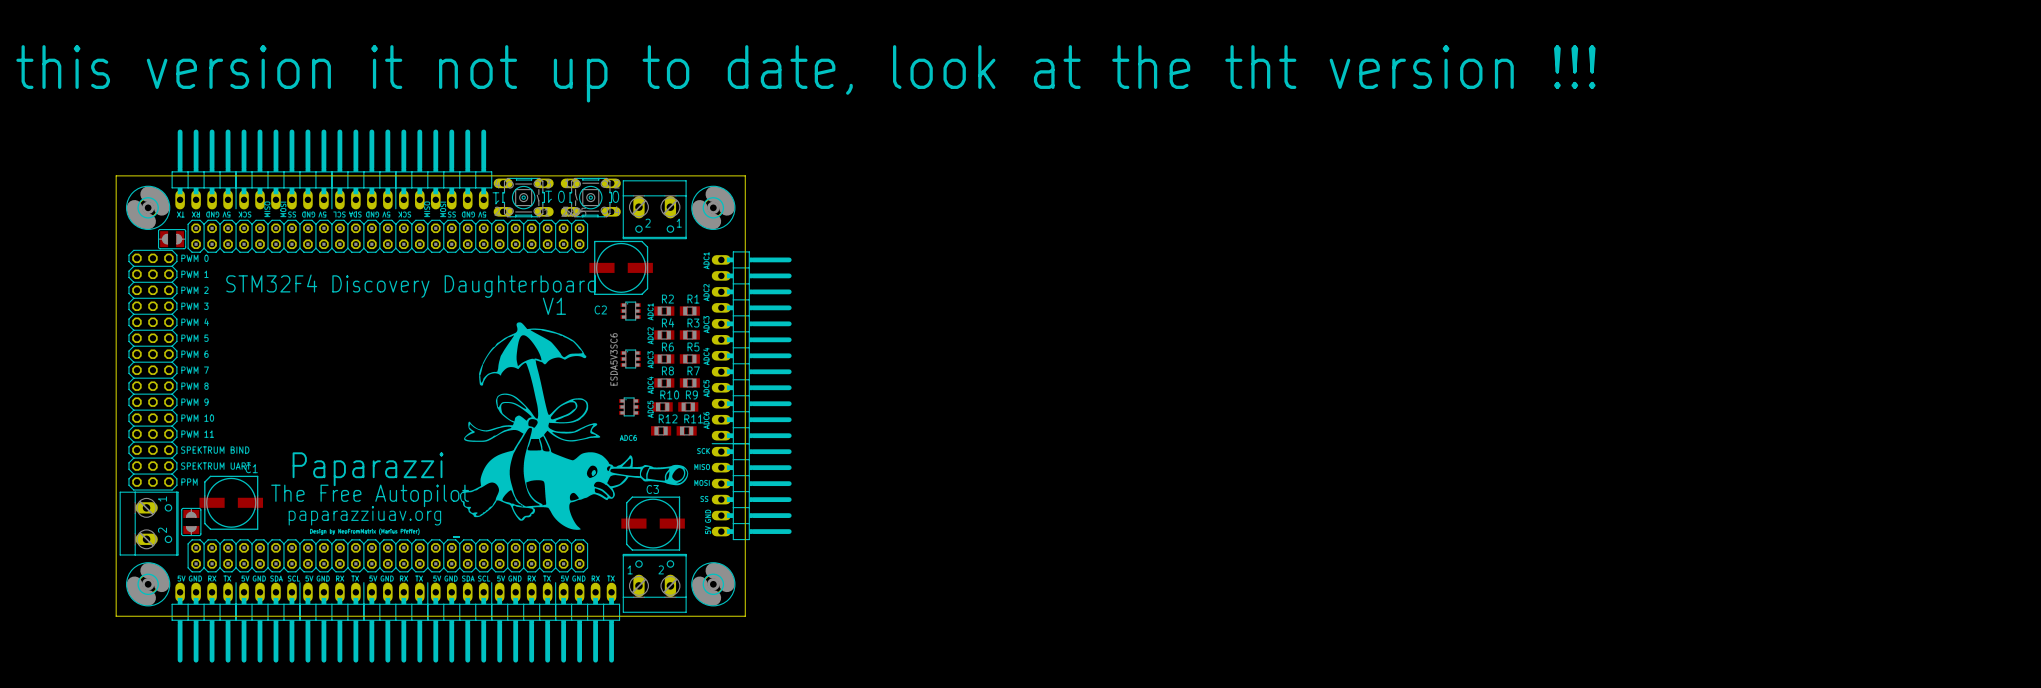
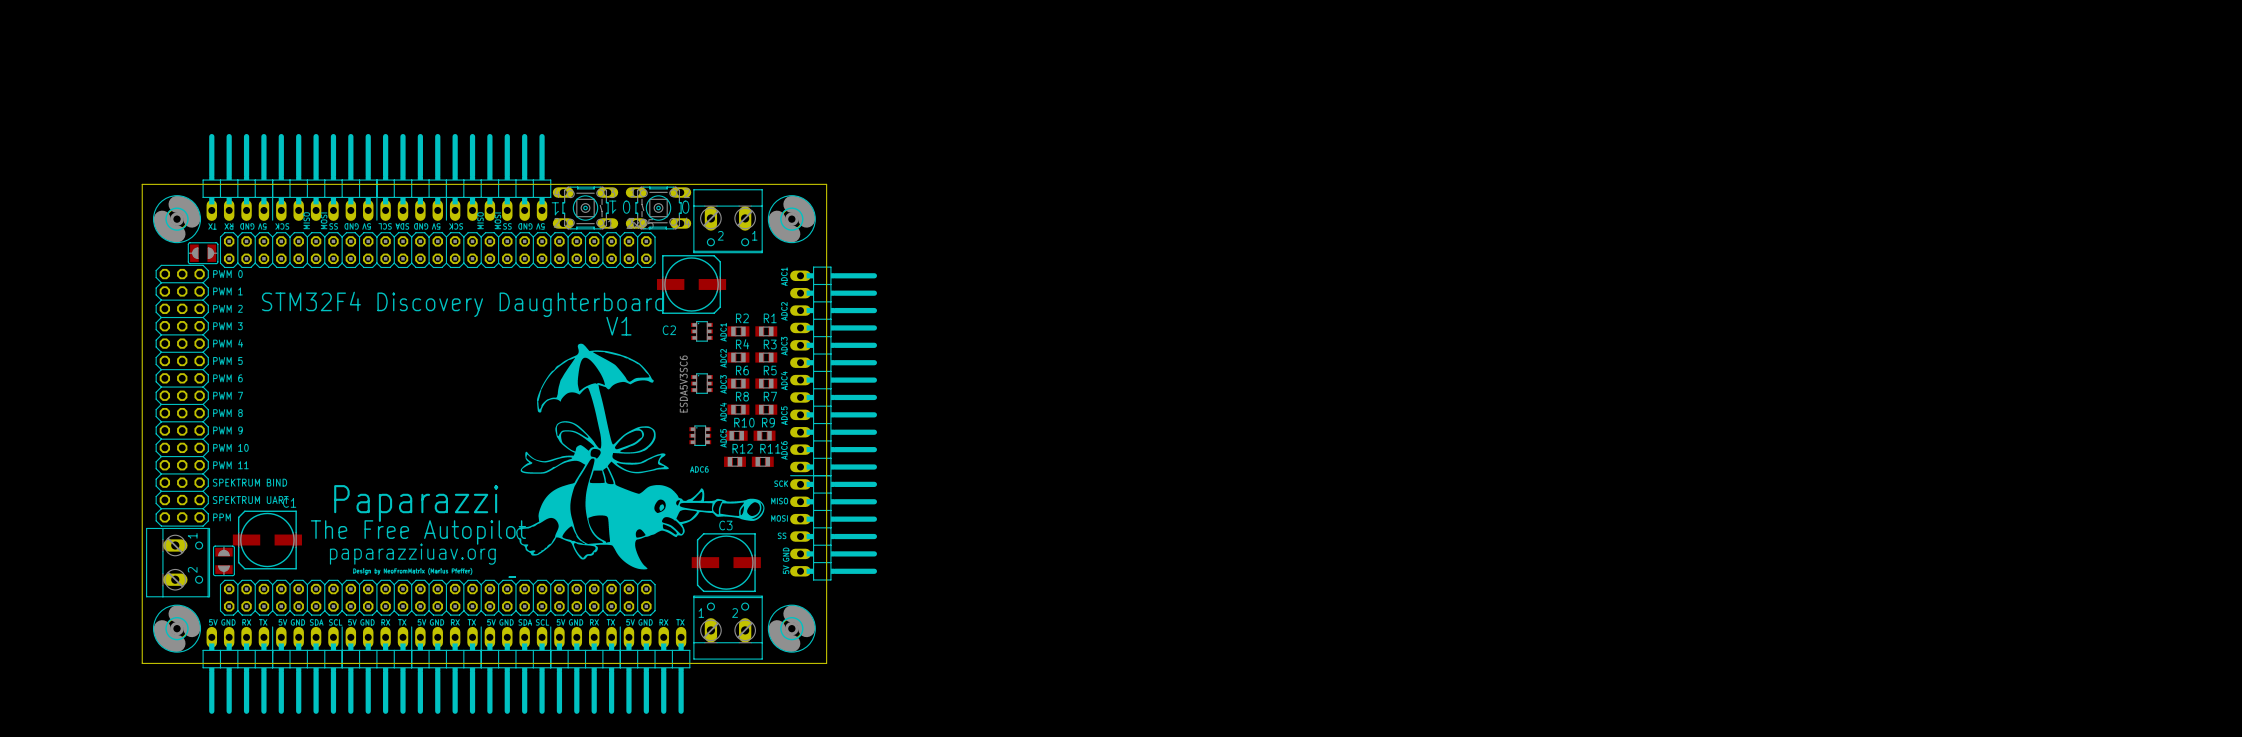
text: this version it not up to date, look at the tht version !!! (805, 73) -> none

